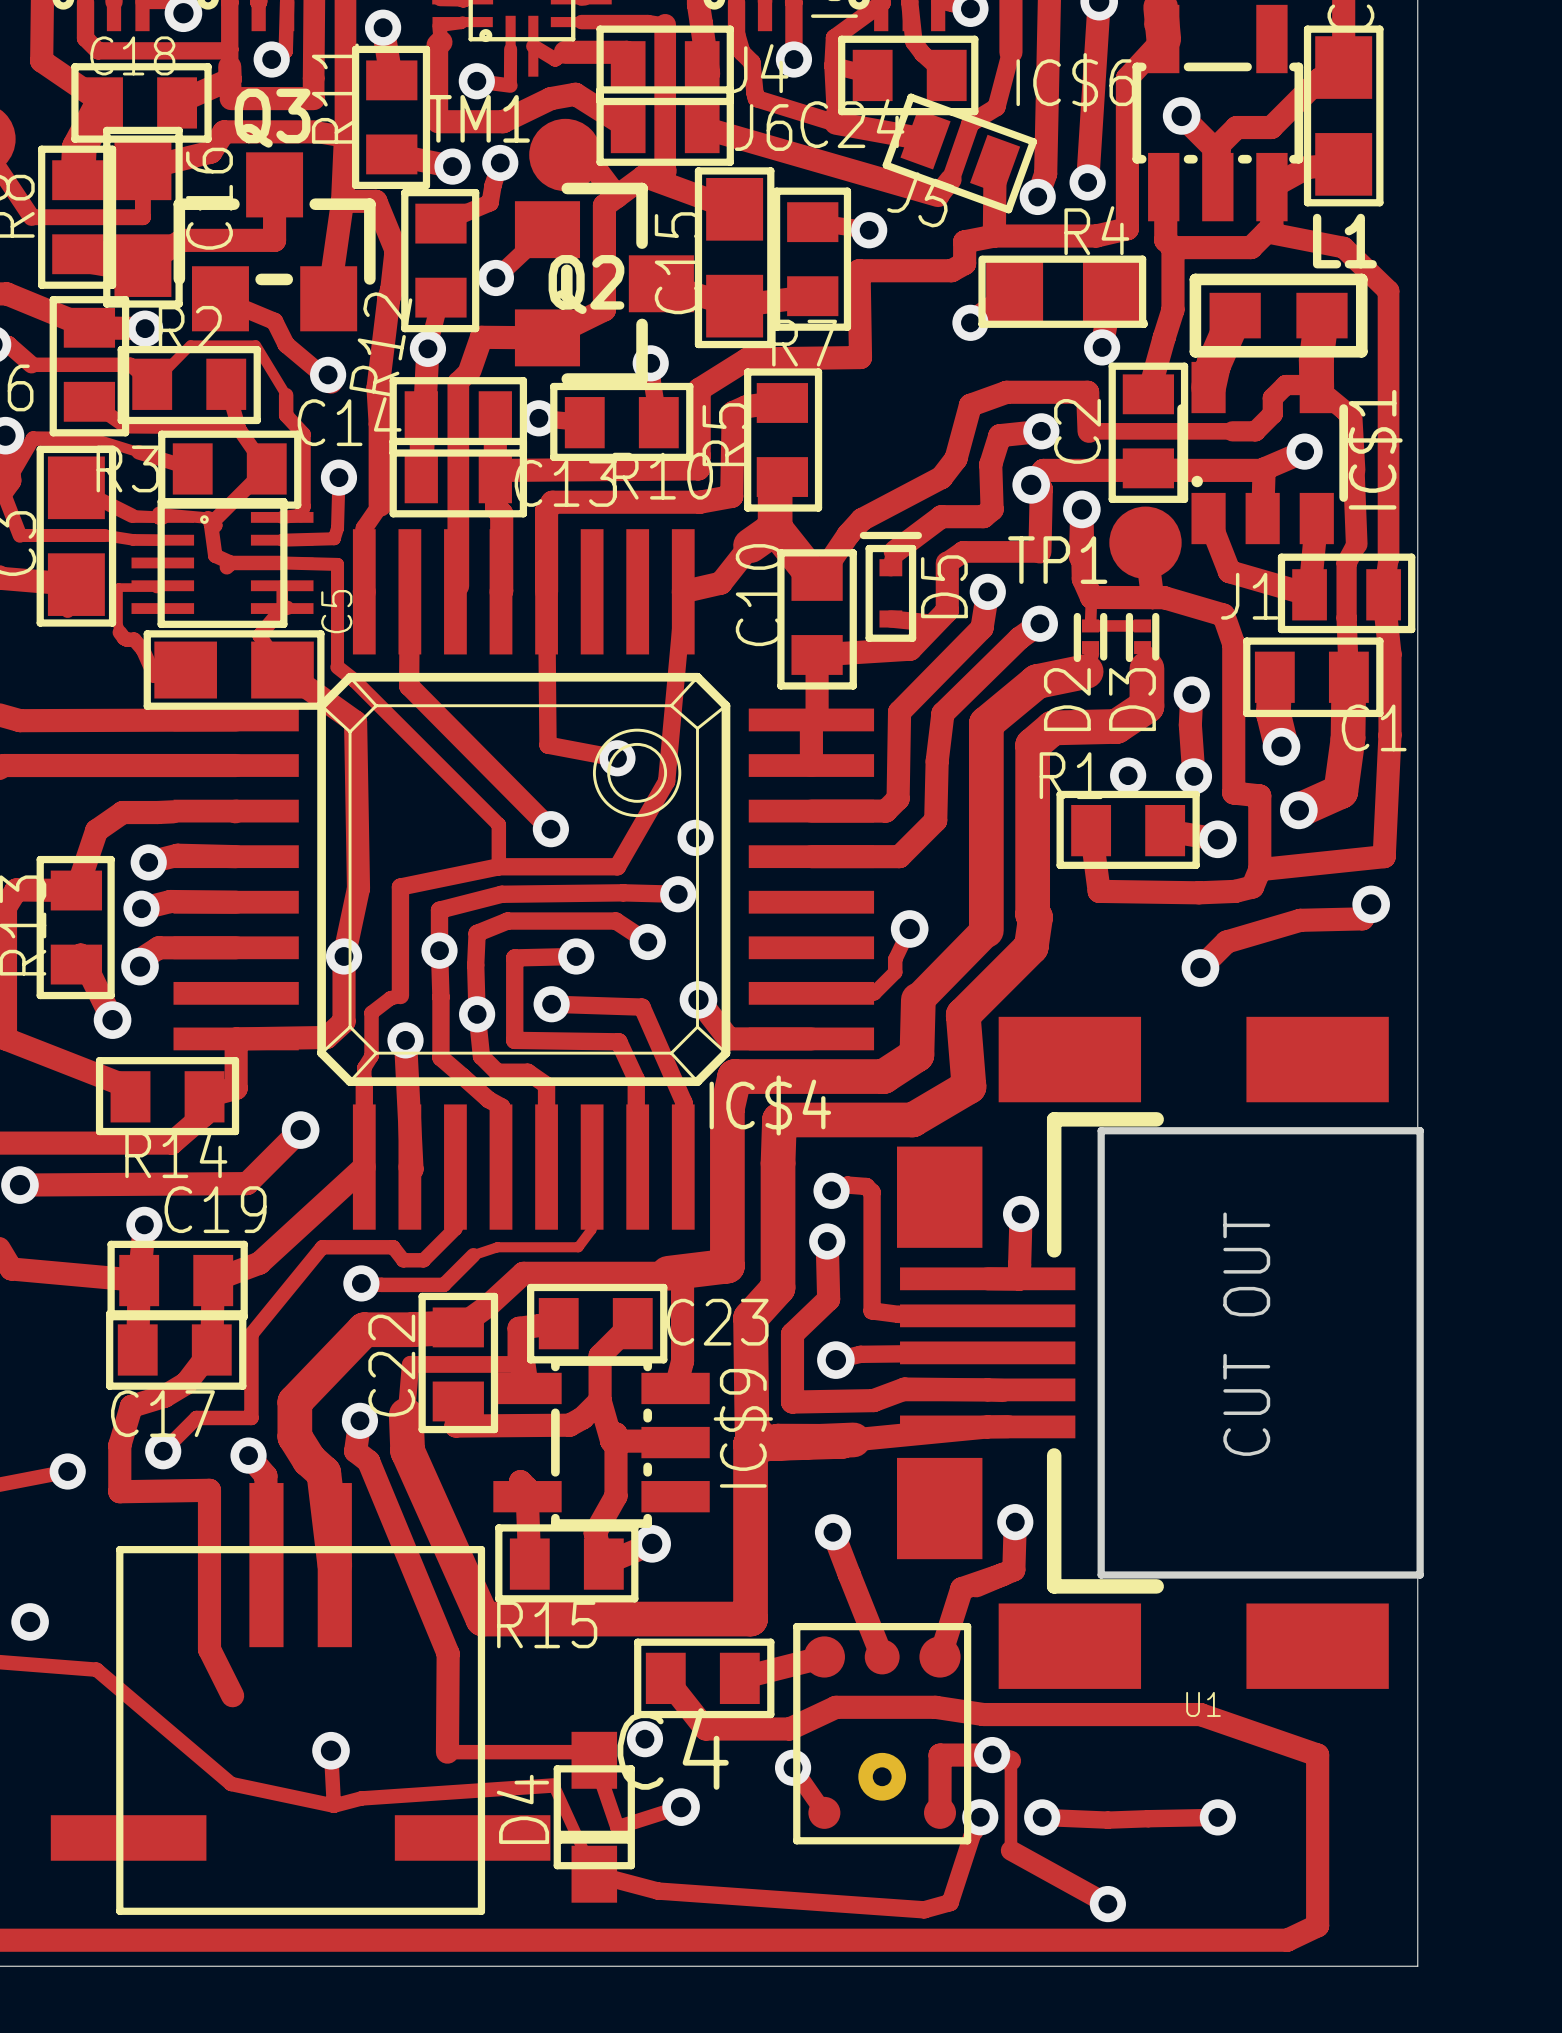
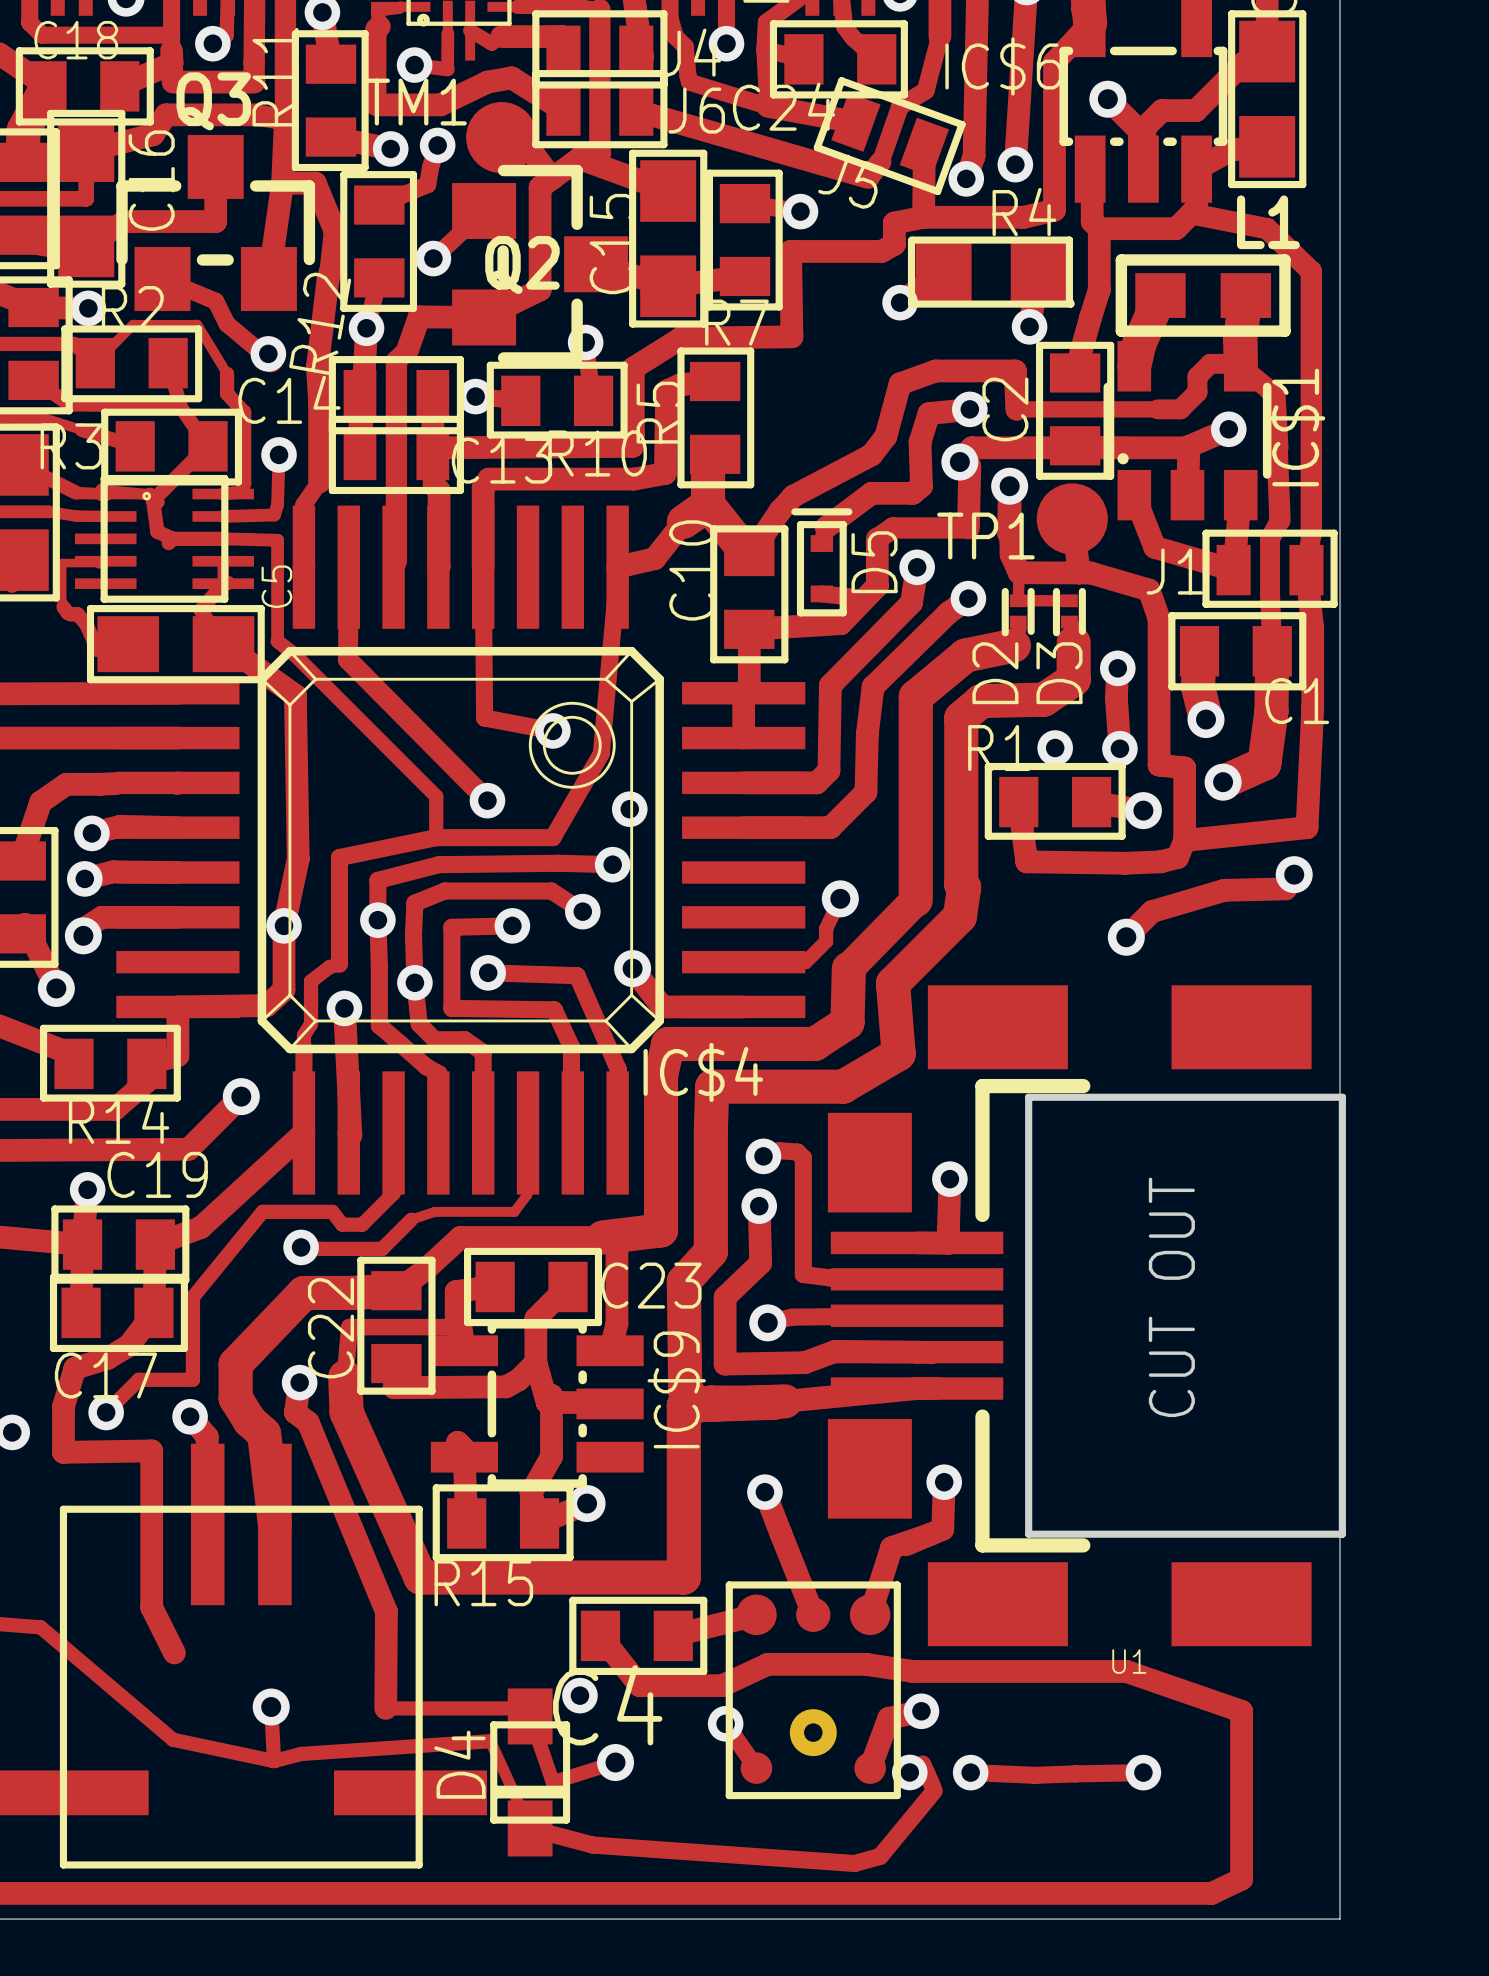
track: (940, 1812) (940, 1755) (992, 1755) (1010, 1760) (1010, 1850) (1107, 1904) -> (870, 1768) (888, 1718) (921, 1711)
track: (980, 1817) (971, 1836) (950, 1902) -> (922, 1763) (934, 1790) (880, 1856)
via: (1107, 1904) -> none

